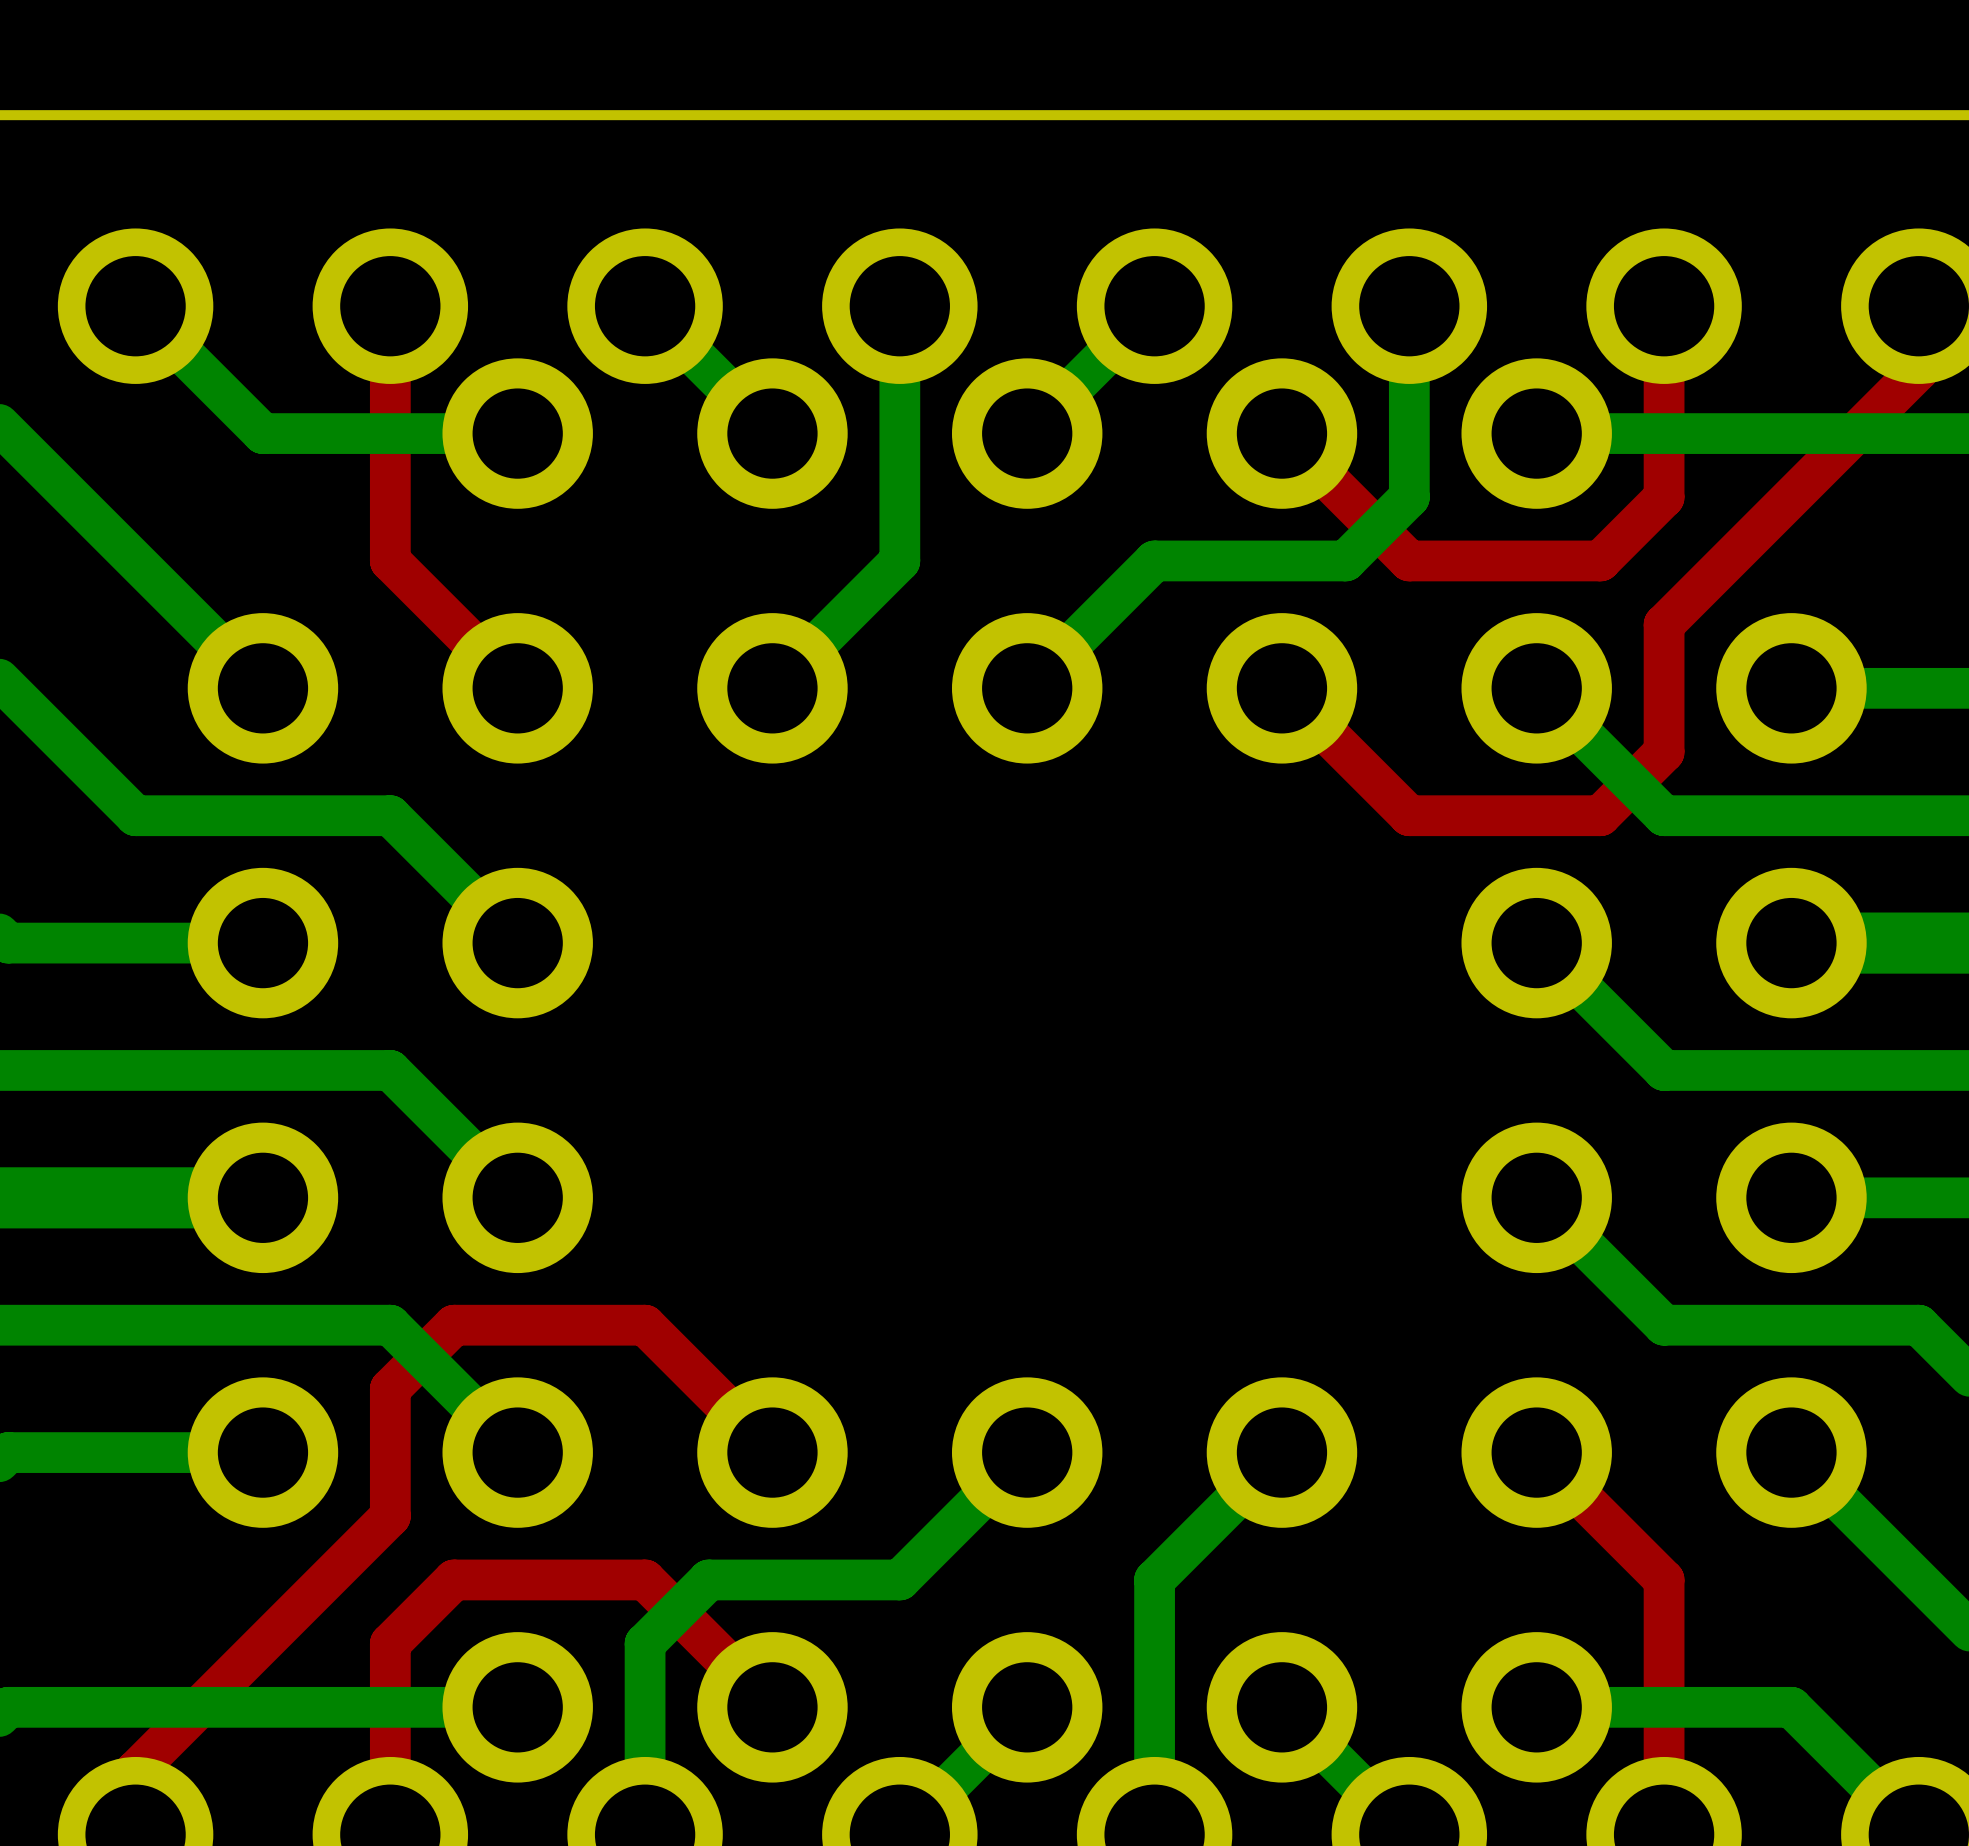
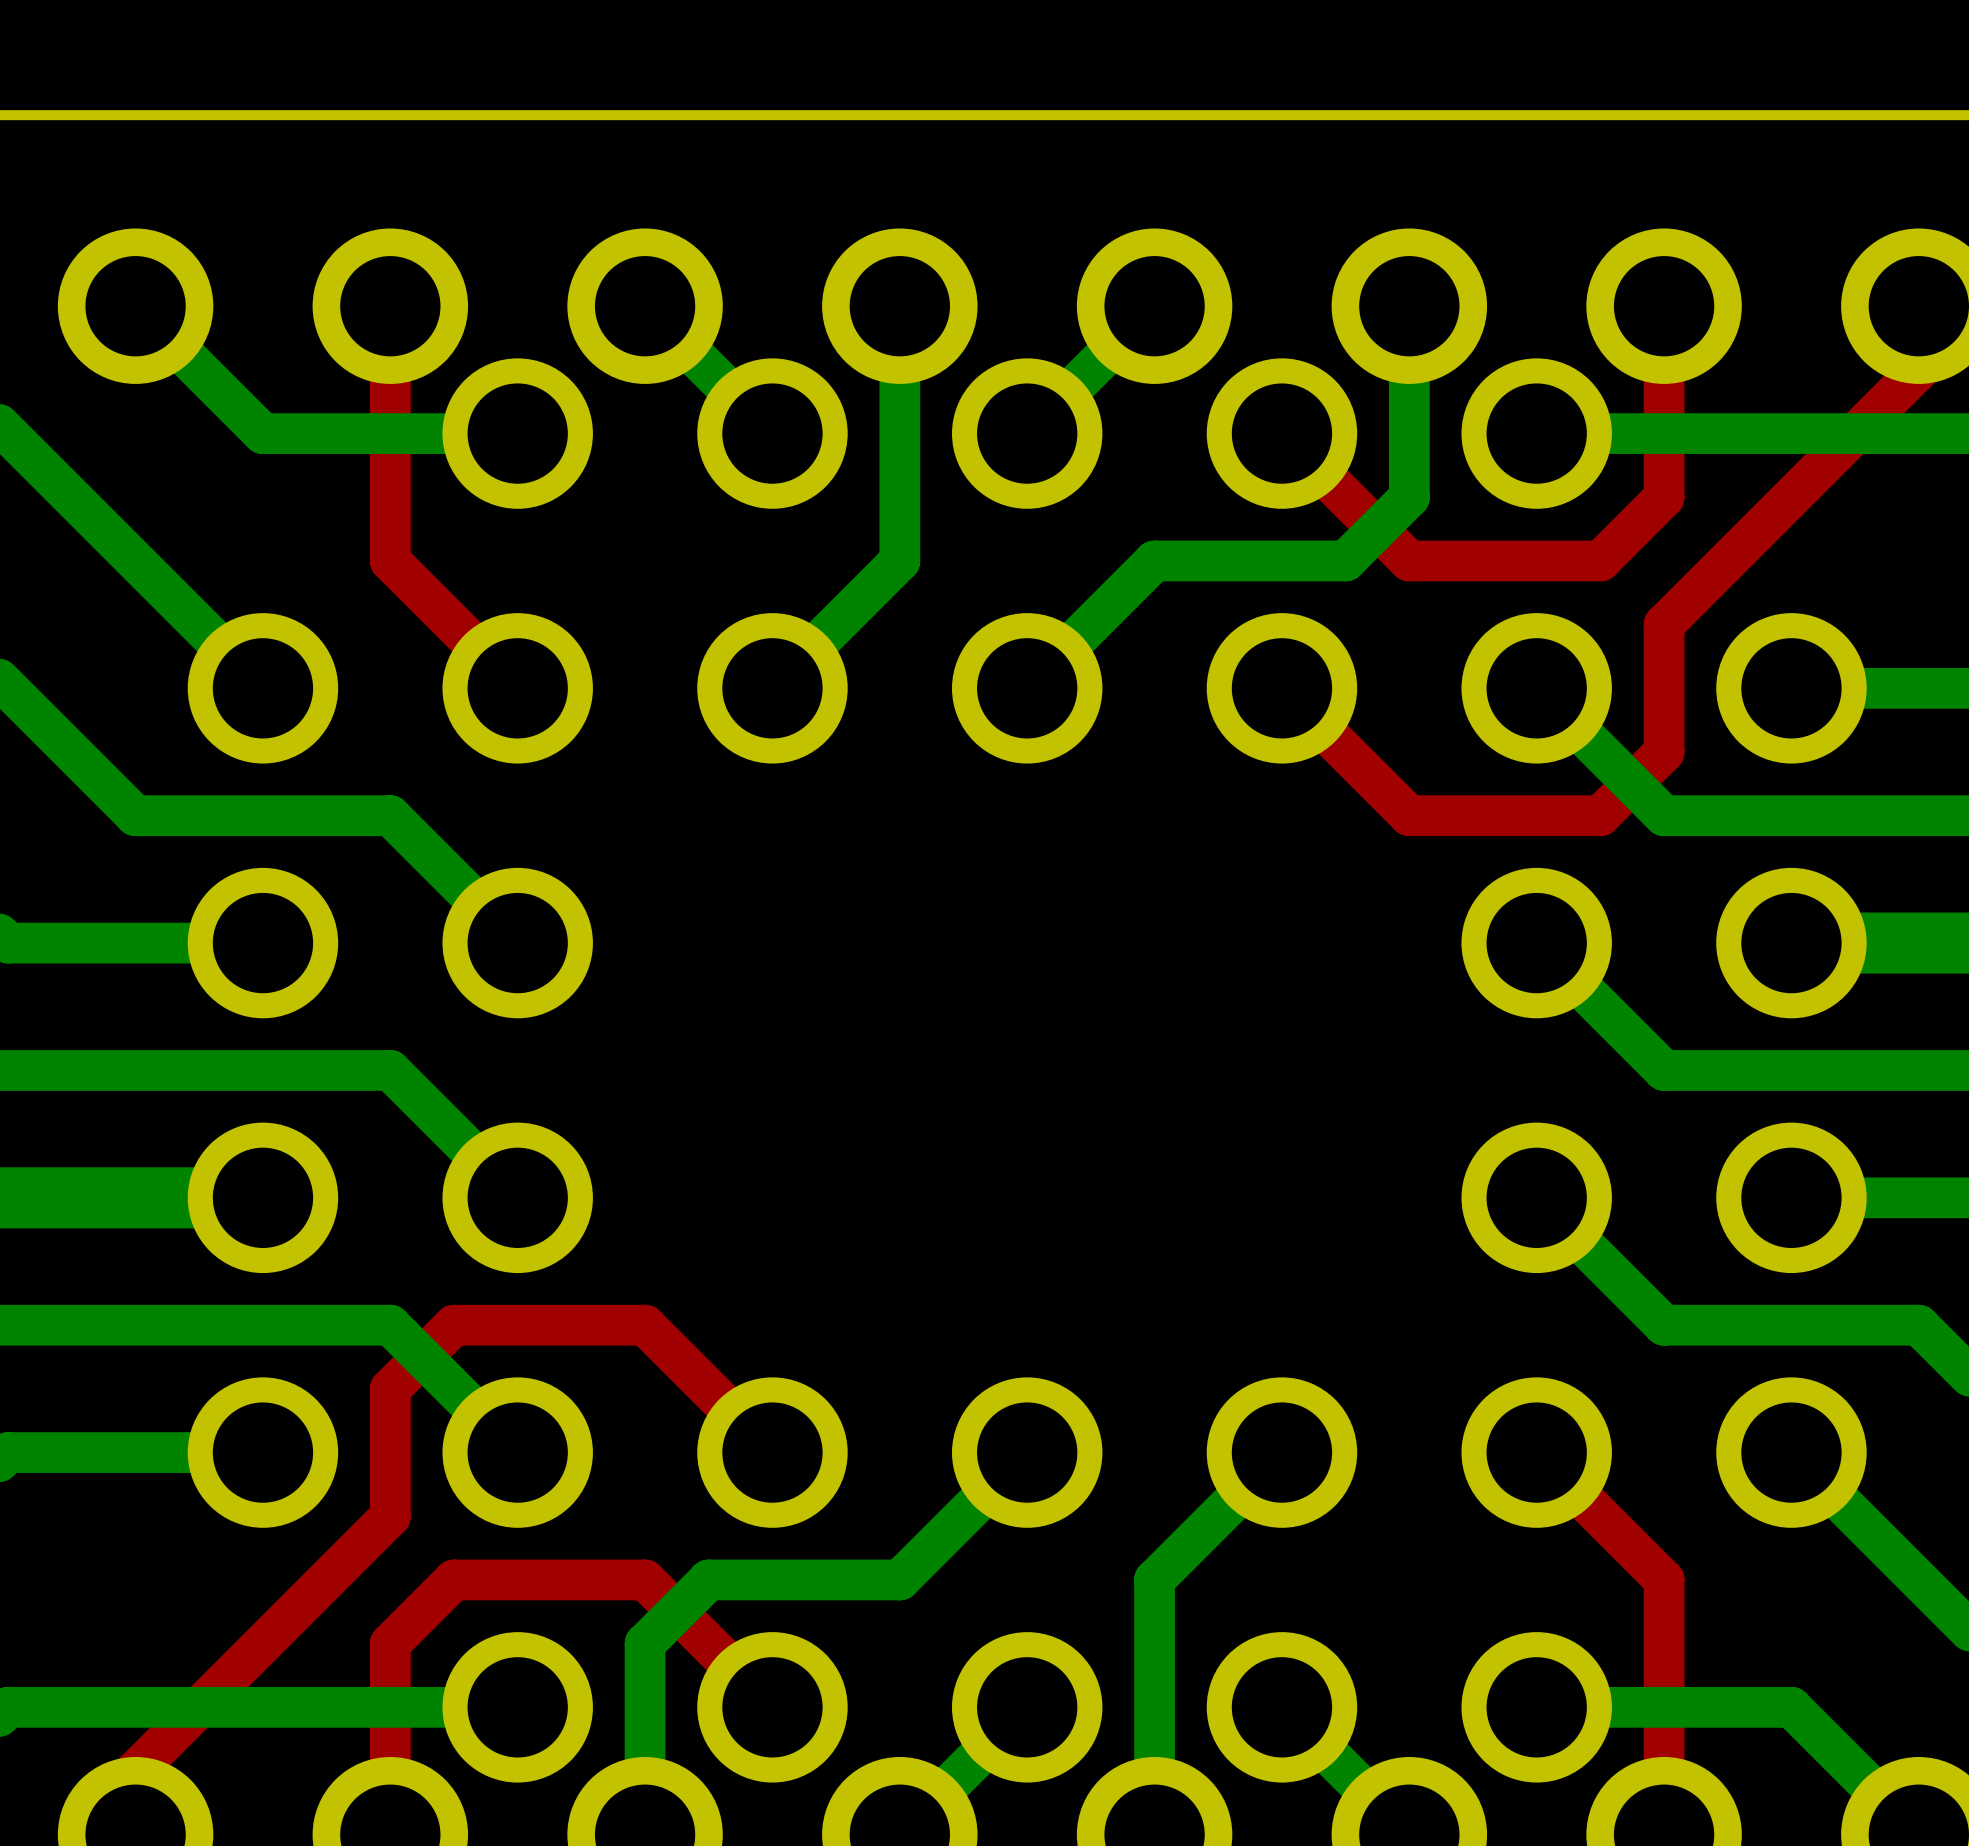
part footprint: [187, 358, 1867, 1783] -> [187, 358, 1867, 1783]

